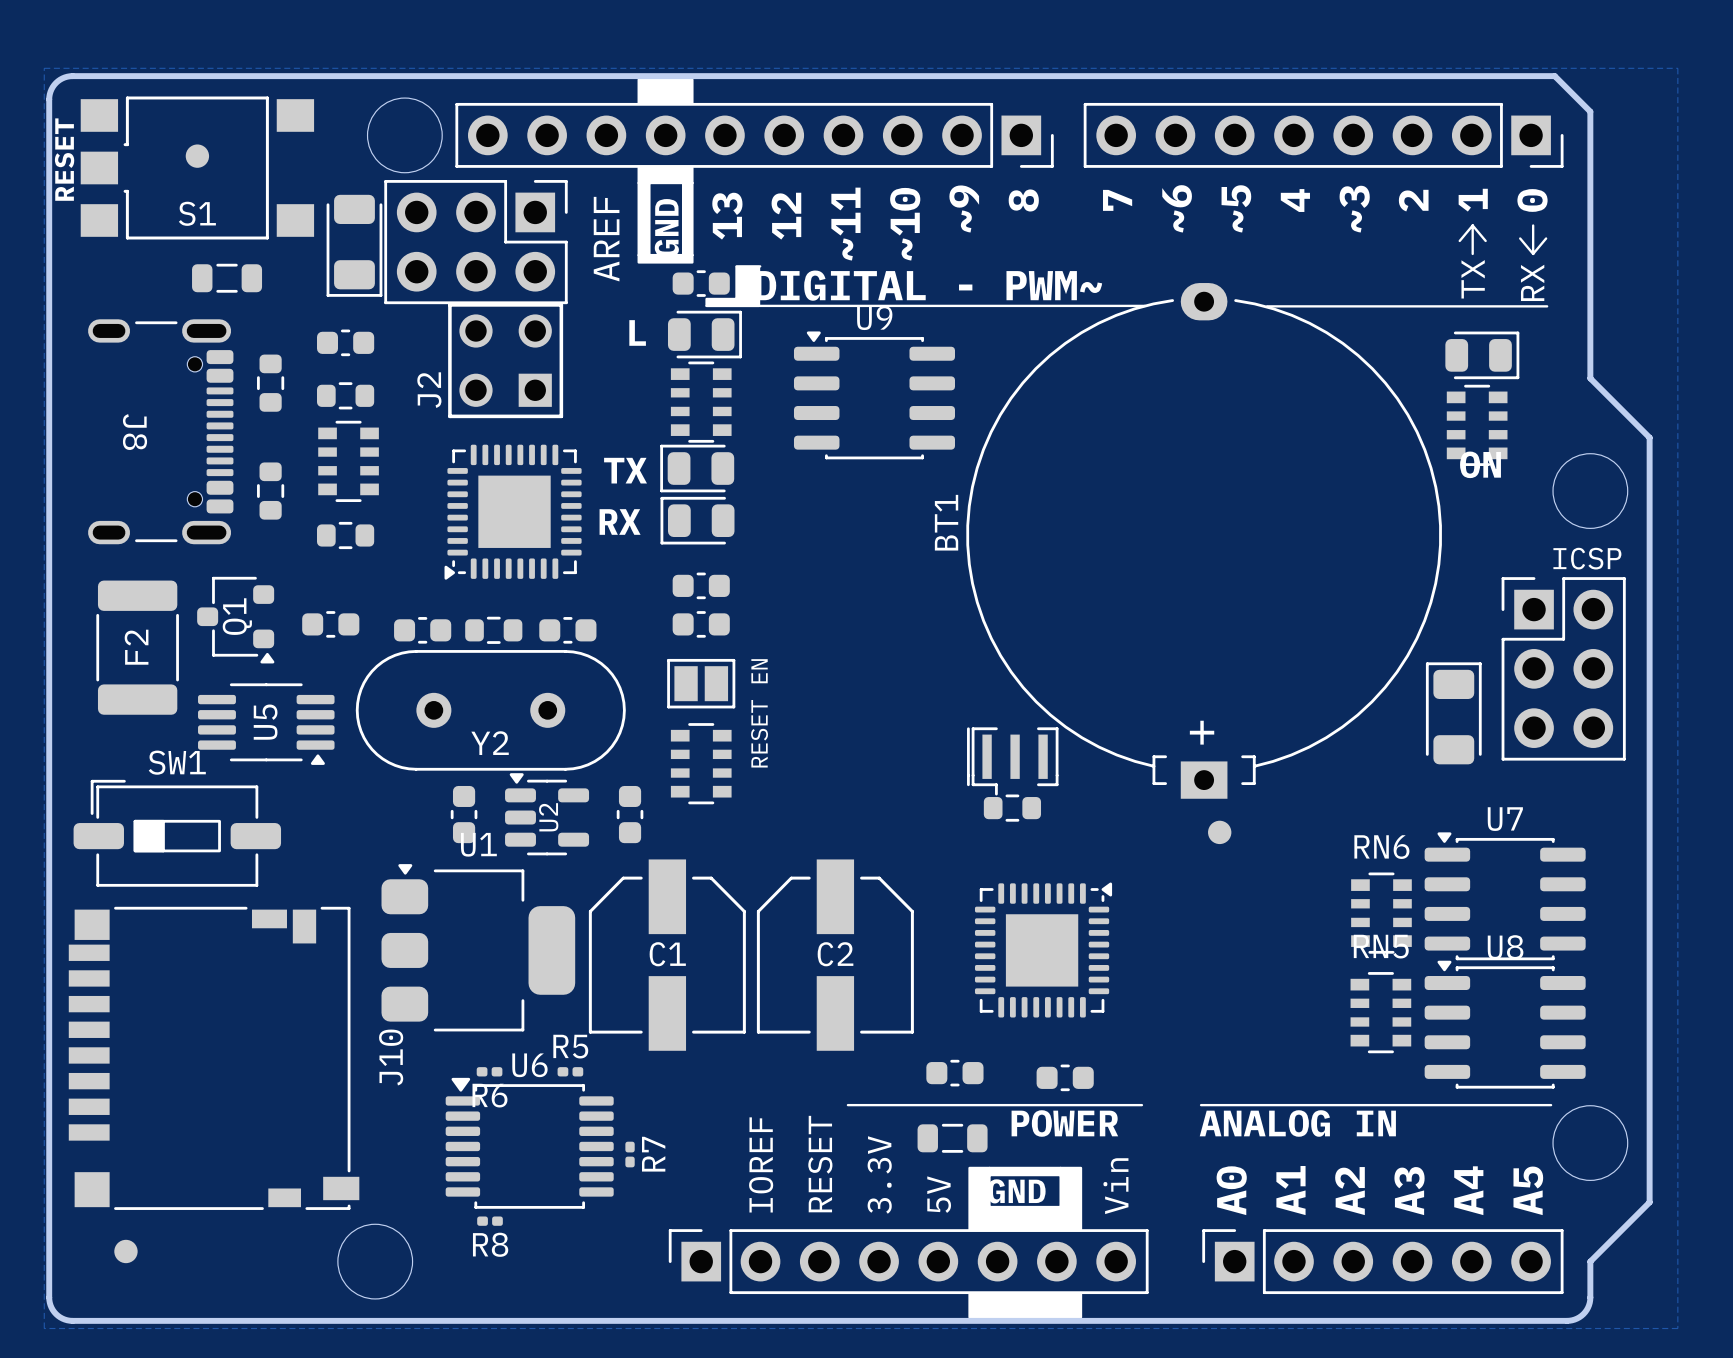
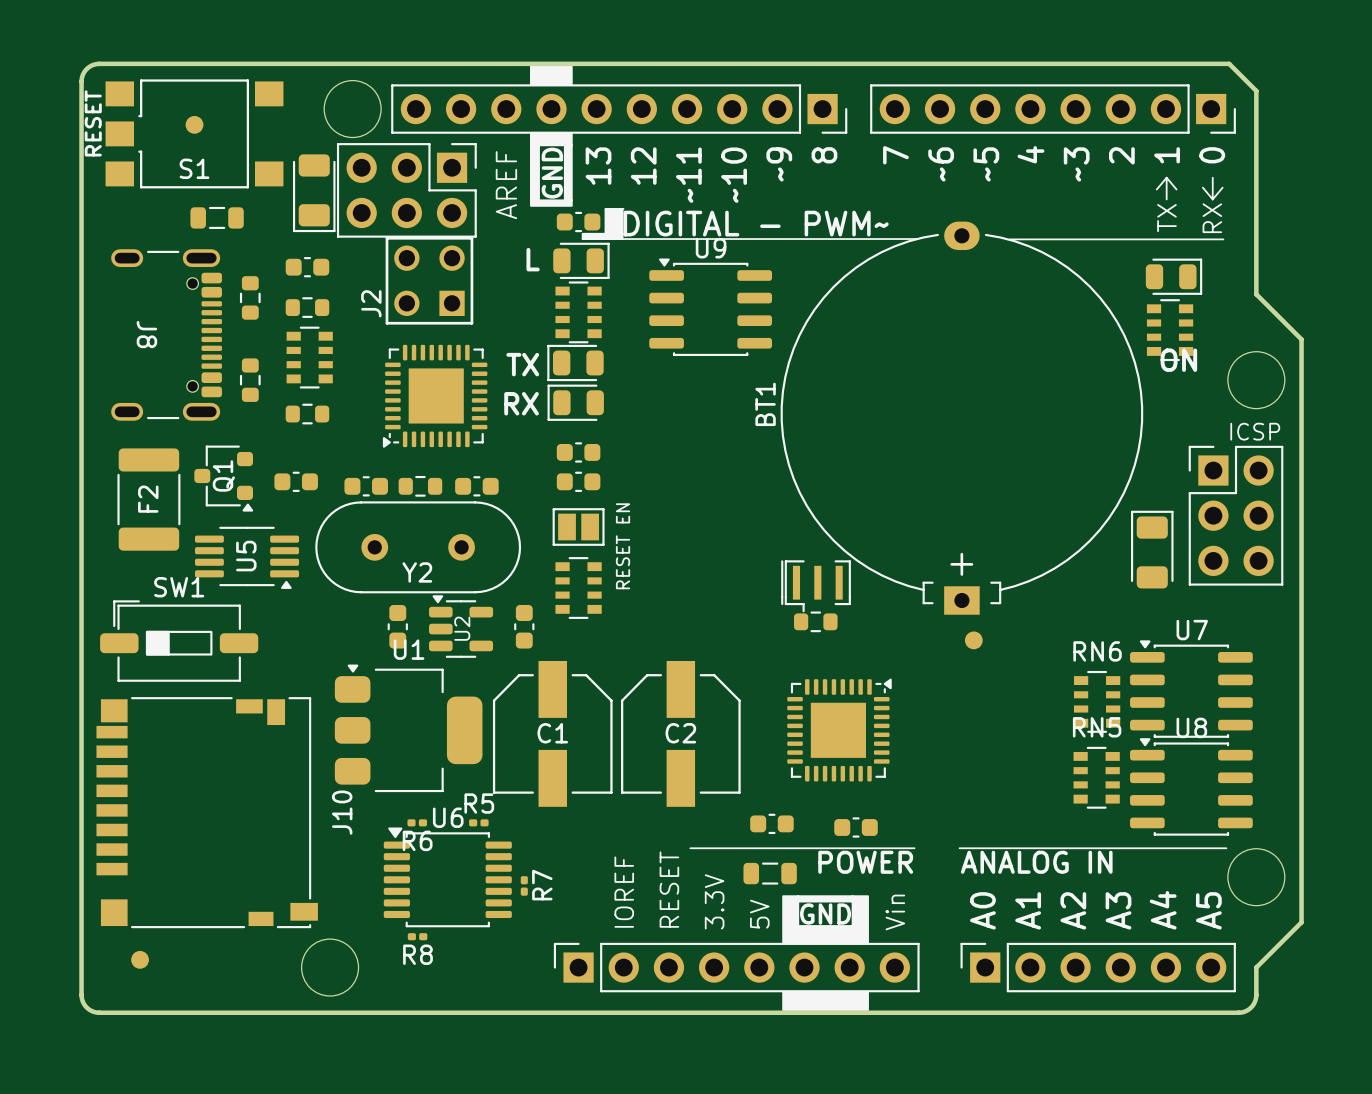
zone outline: (44, 68) (1677, 68) (1677, 1328) (44, 1328) (44, 68) -> none

